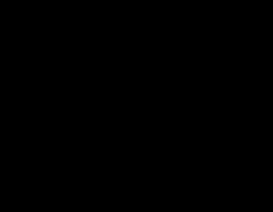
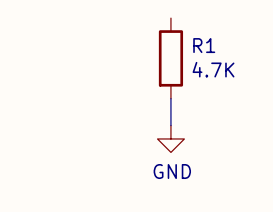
R1: none -> 4.7K (170, 58)
wire: none -> (170, 98) (170, 125)
power symbol: none -> GND (170, 138)

